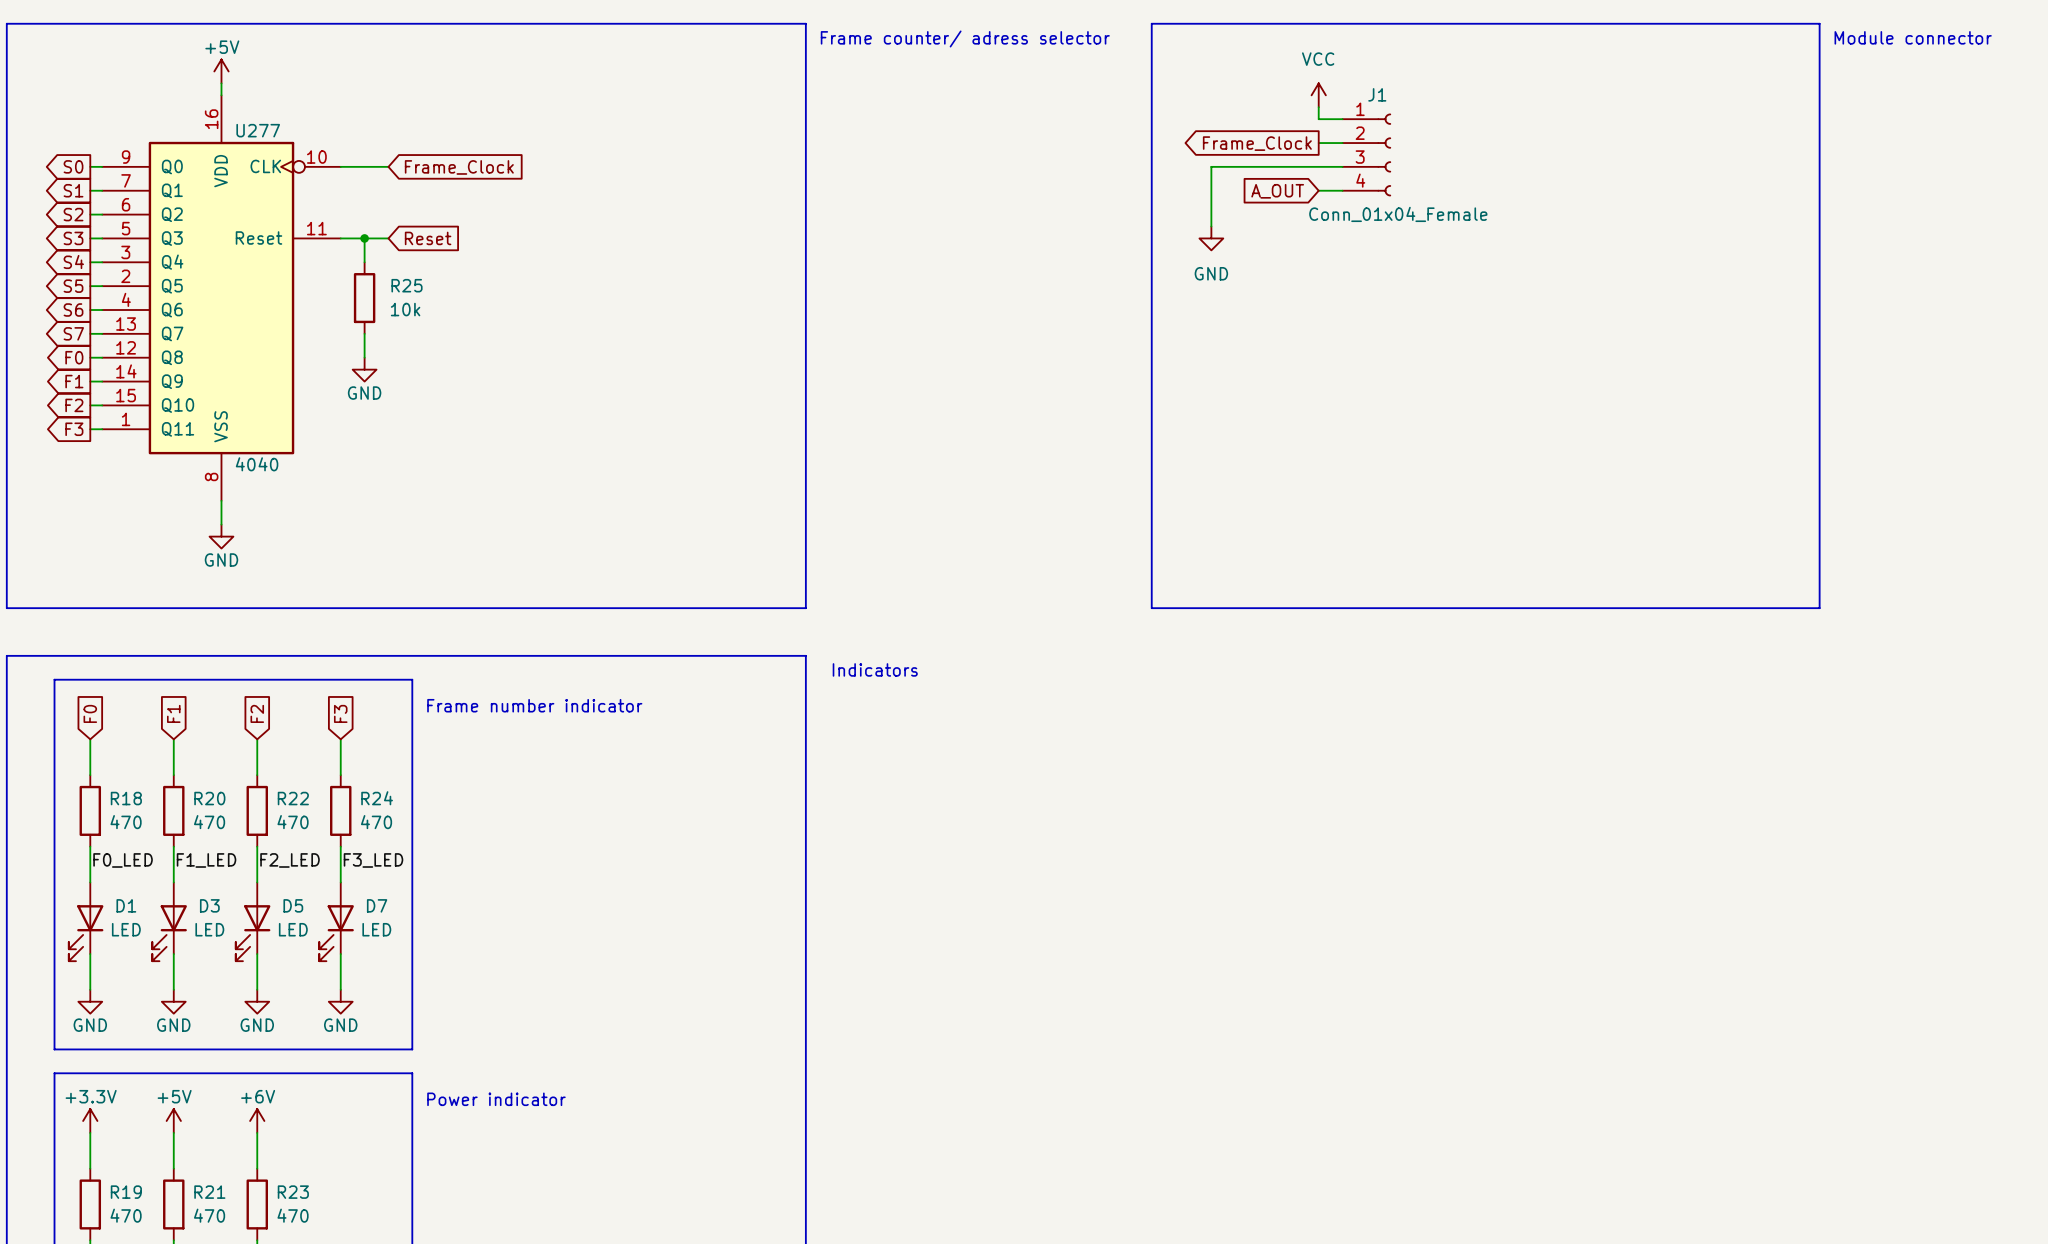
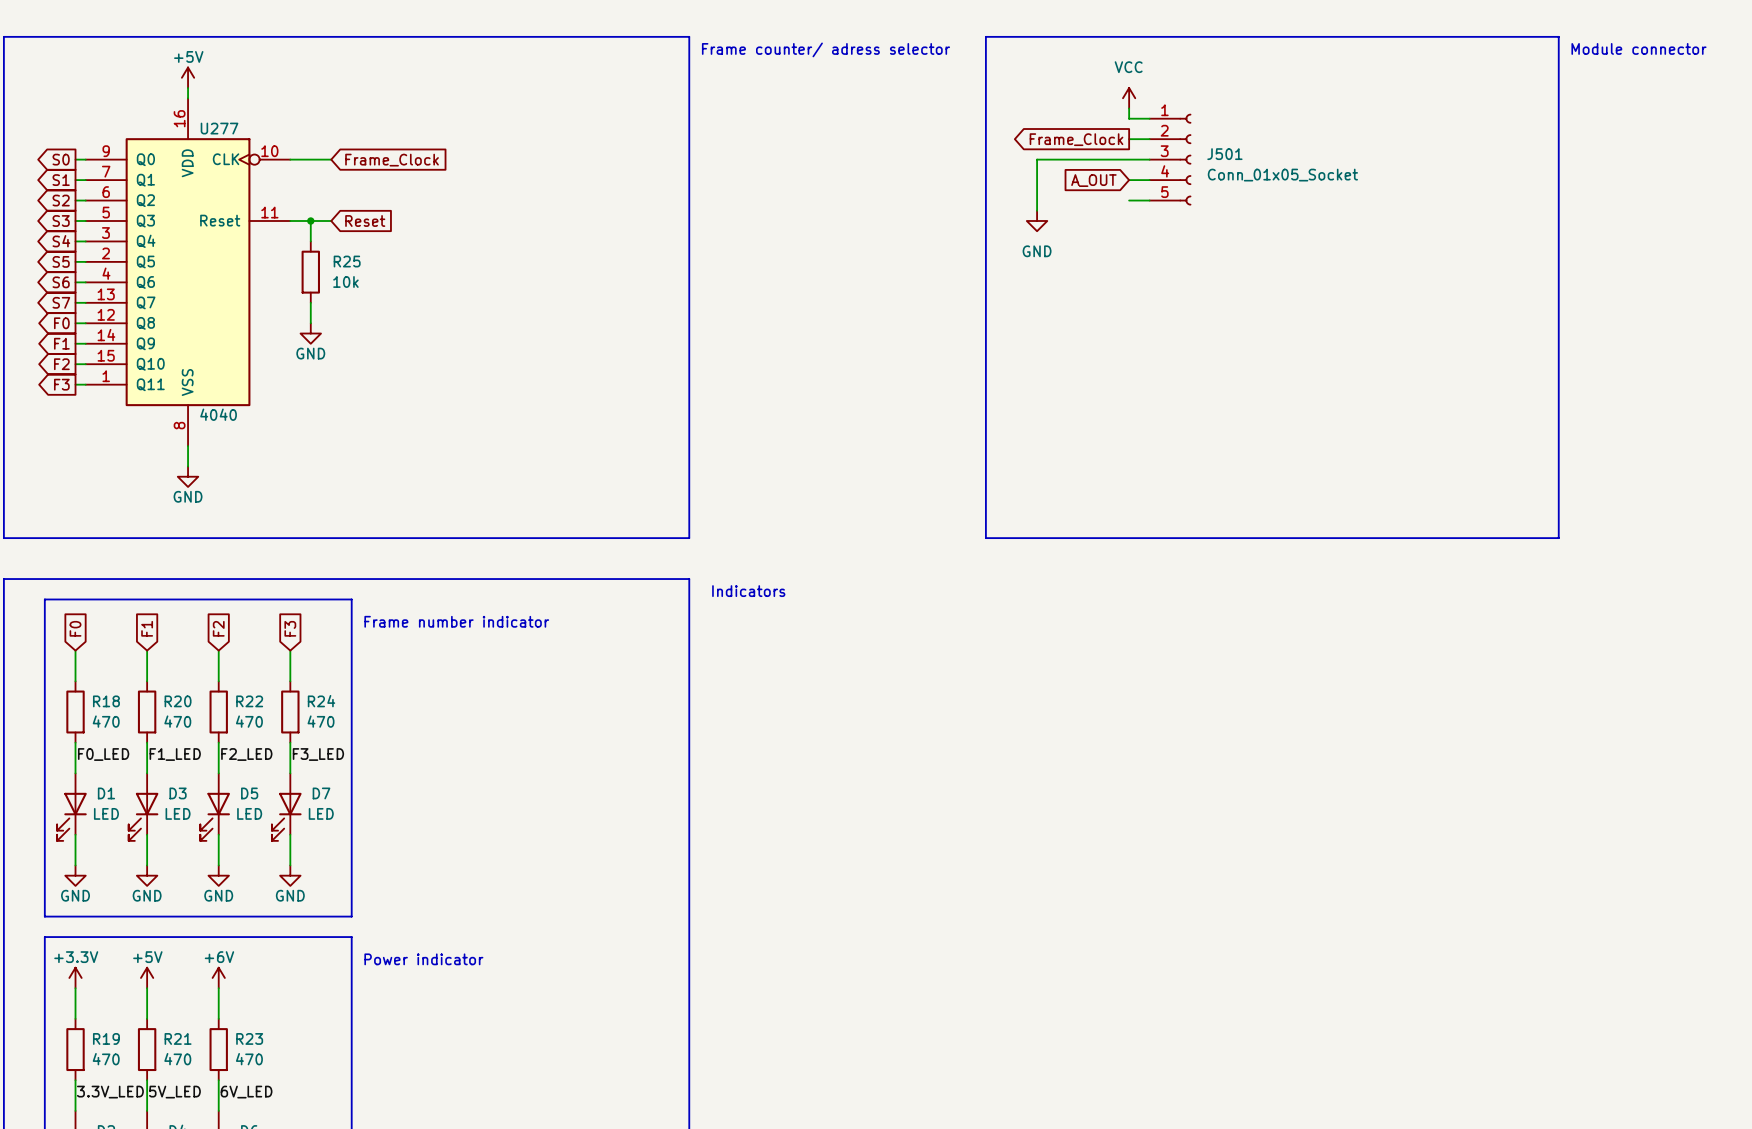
J1: Conn_01x04_Female (1366, 154) -> none
J501: none -> Conn_01x05_Socket (1170, 159)
wire: none -> (1129, 200) (1149, 200)

